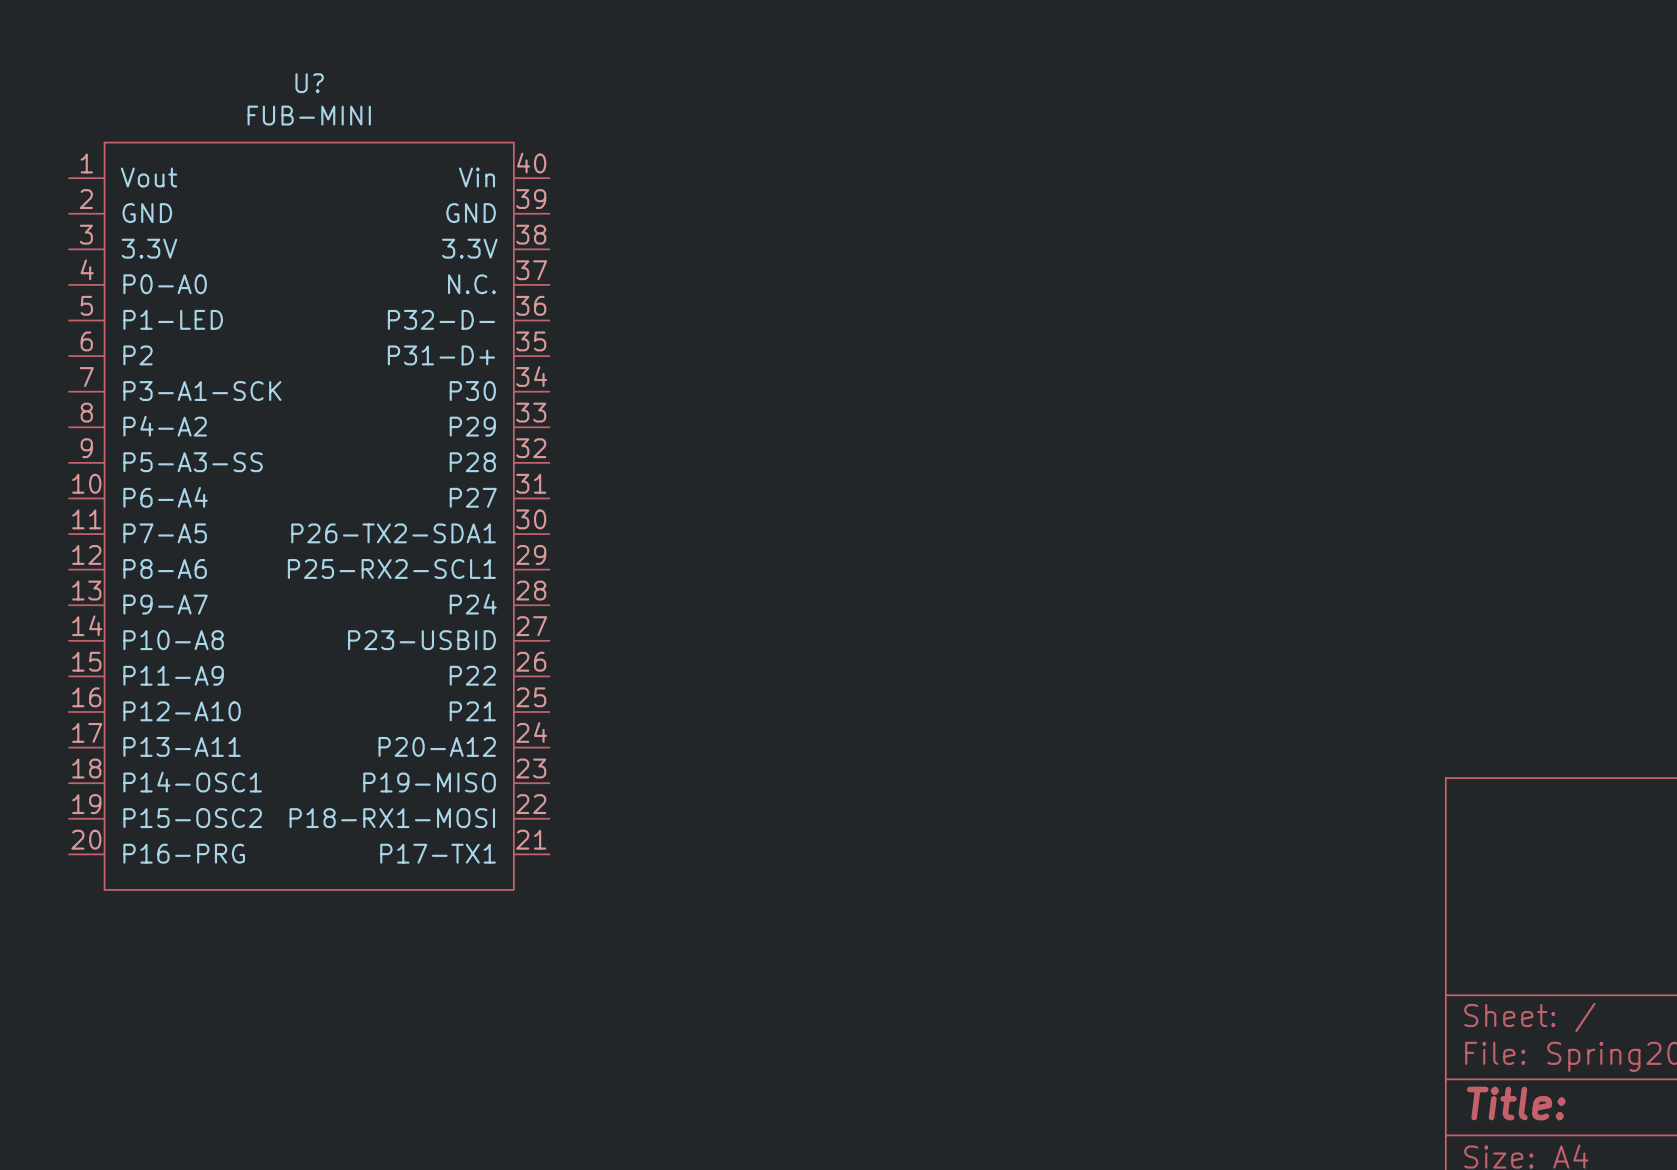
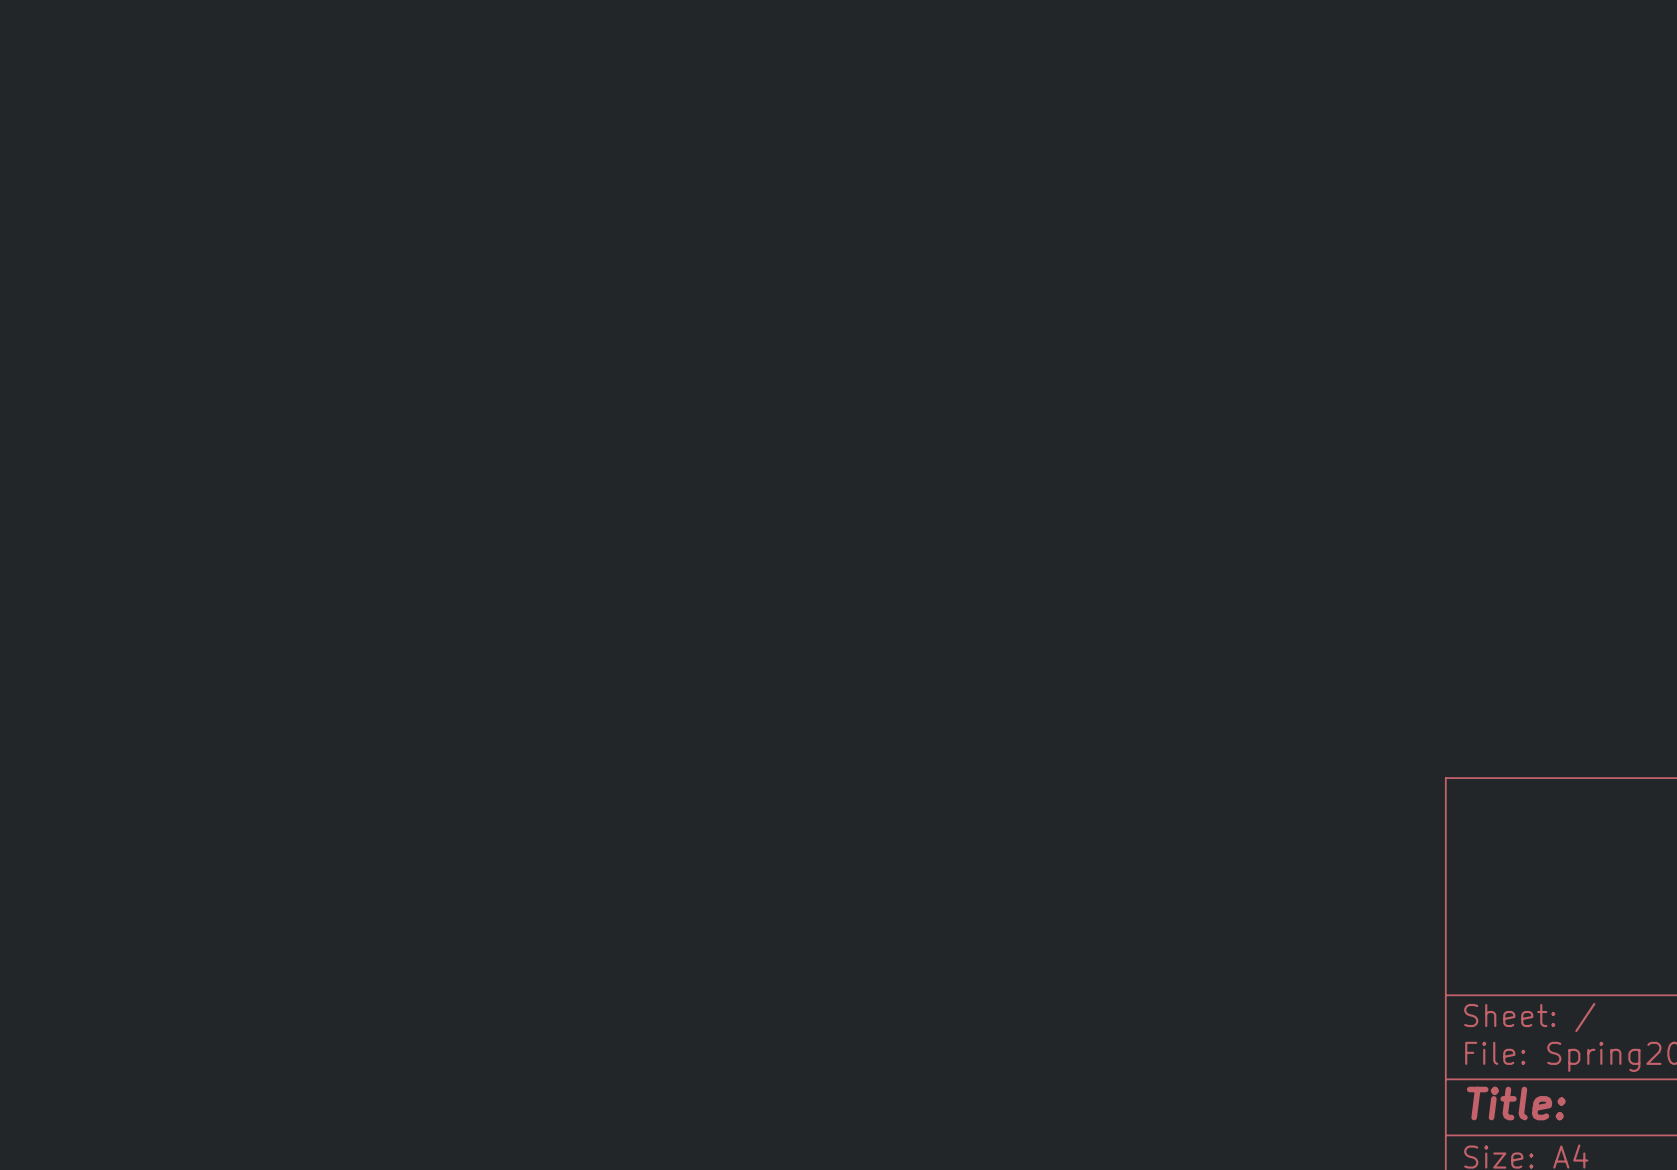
U?: FUB-MINI (309, 516) -> none

